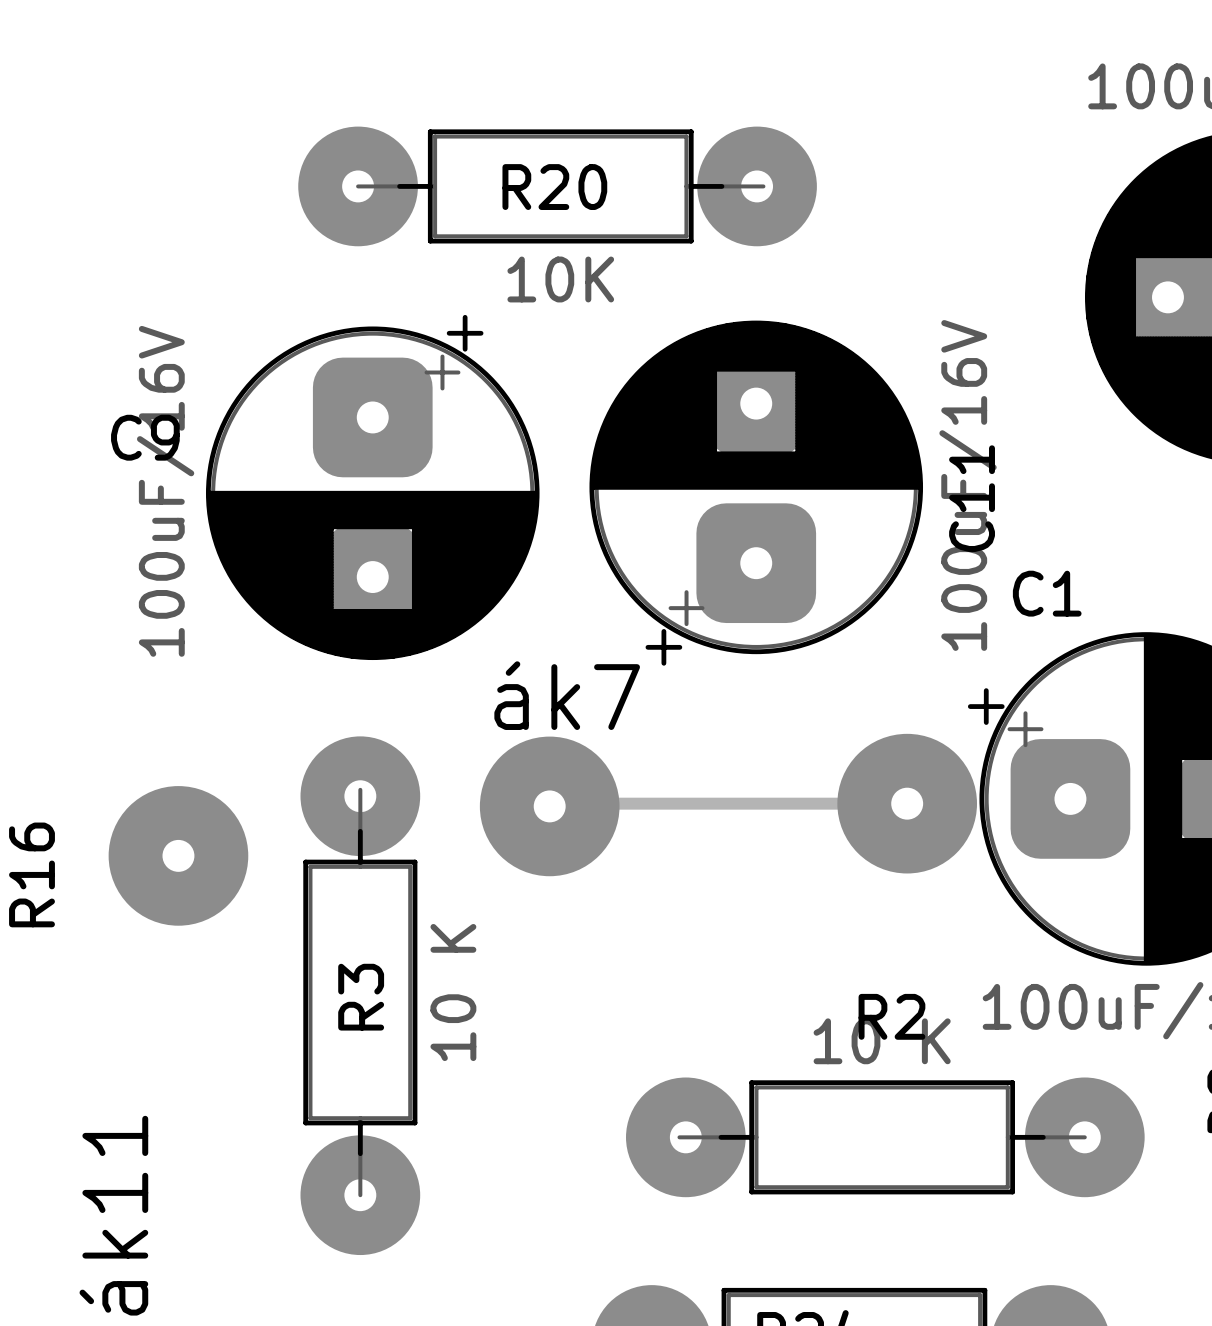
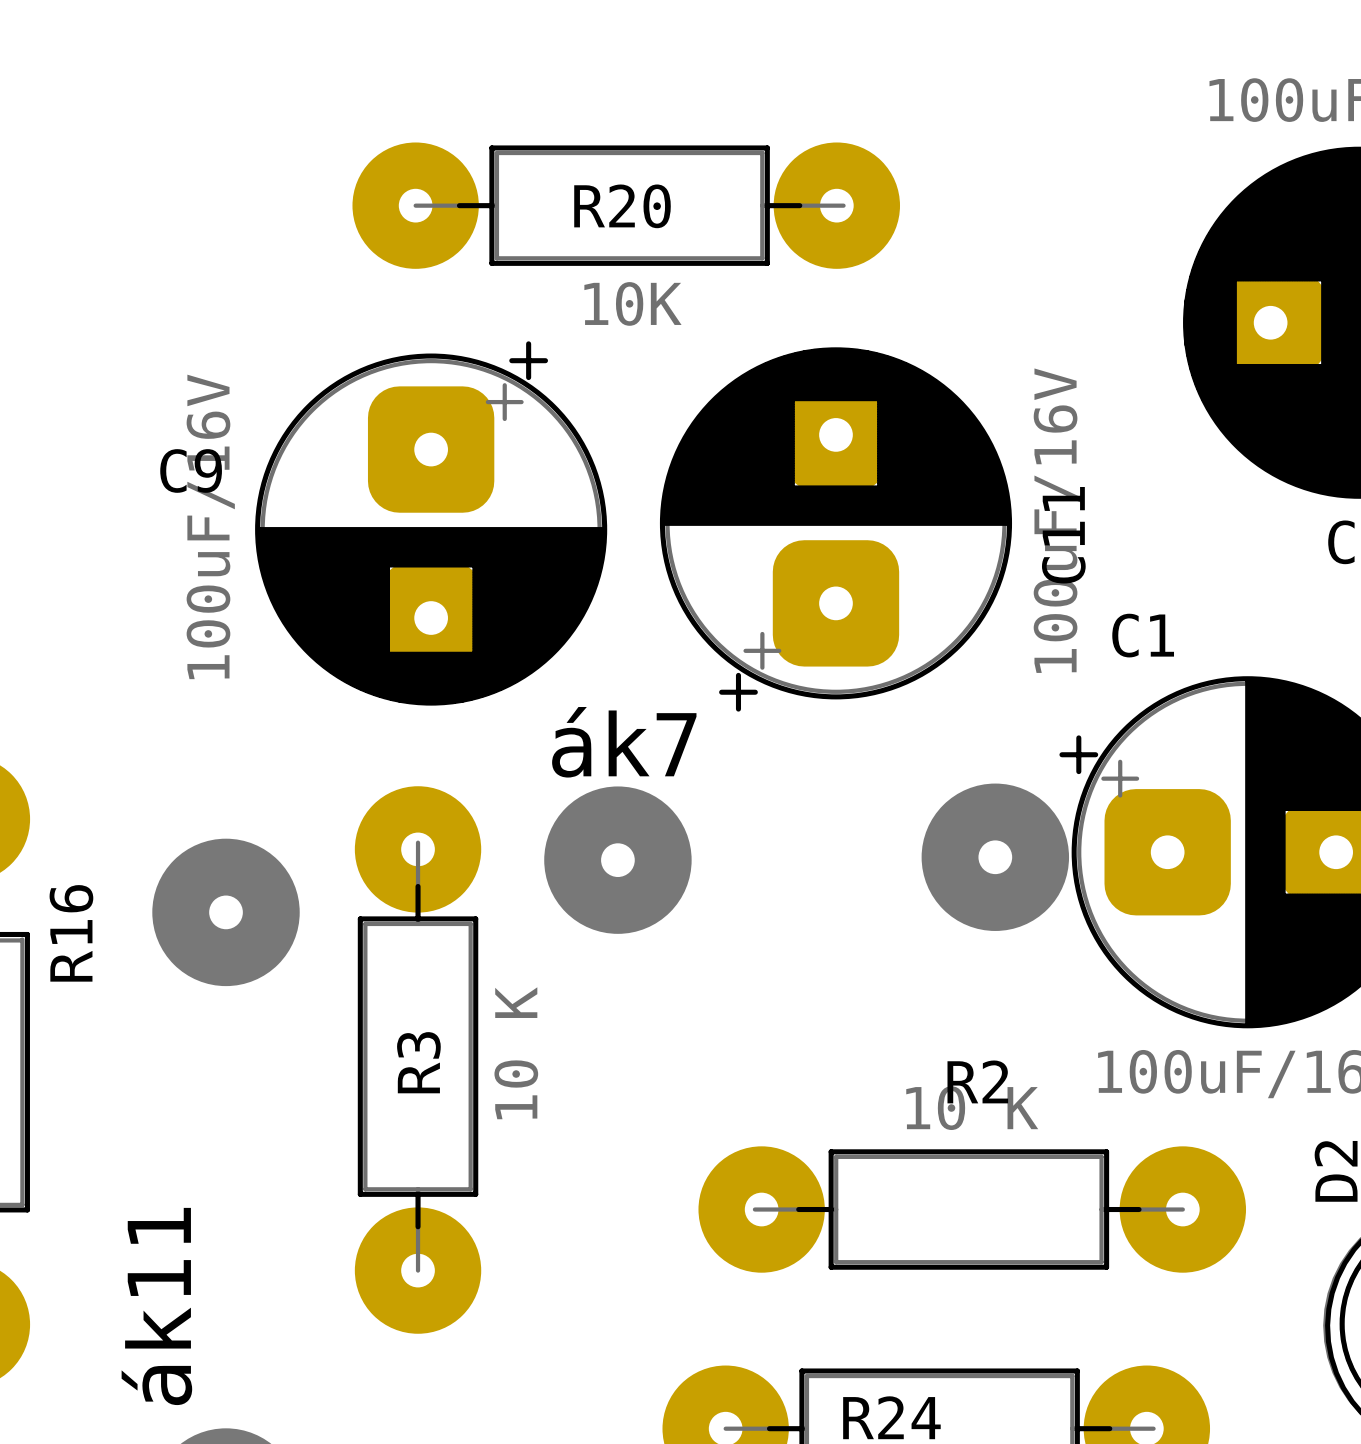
track: (552, 803) (907, 803) -> none

